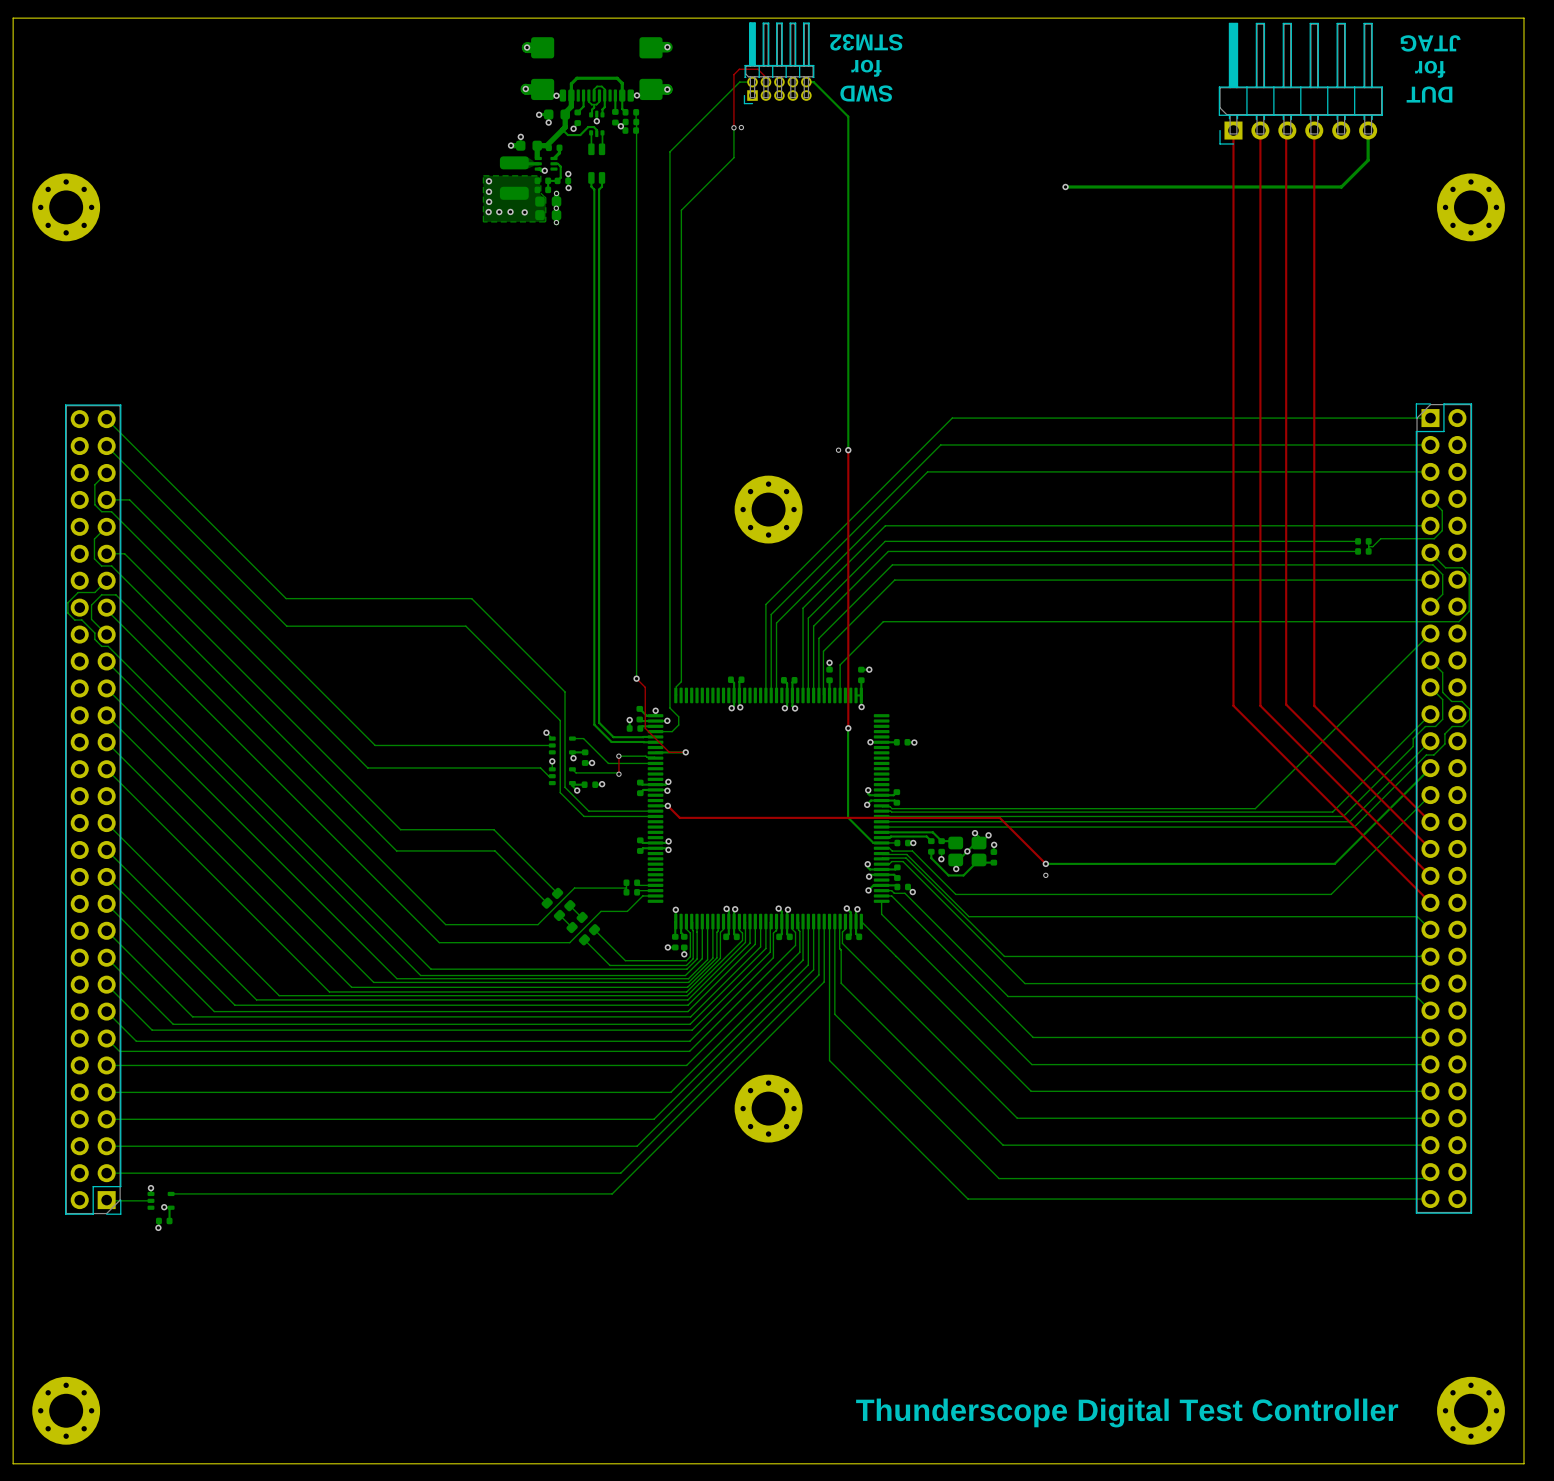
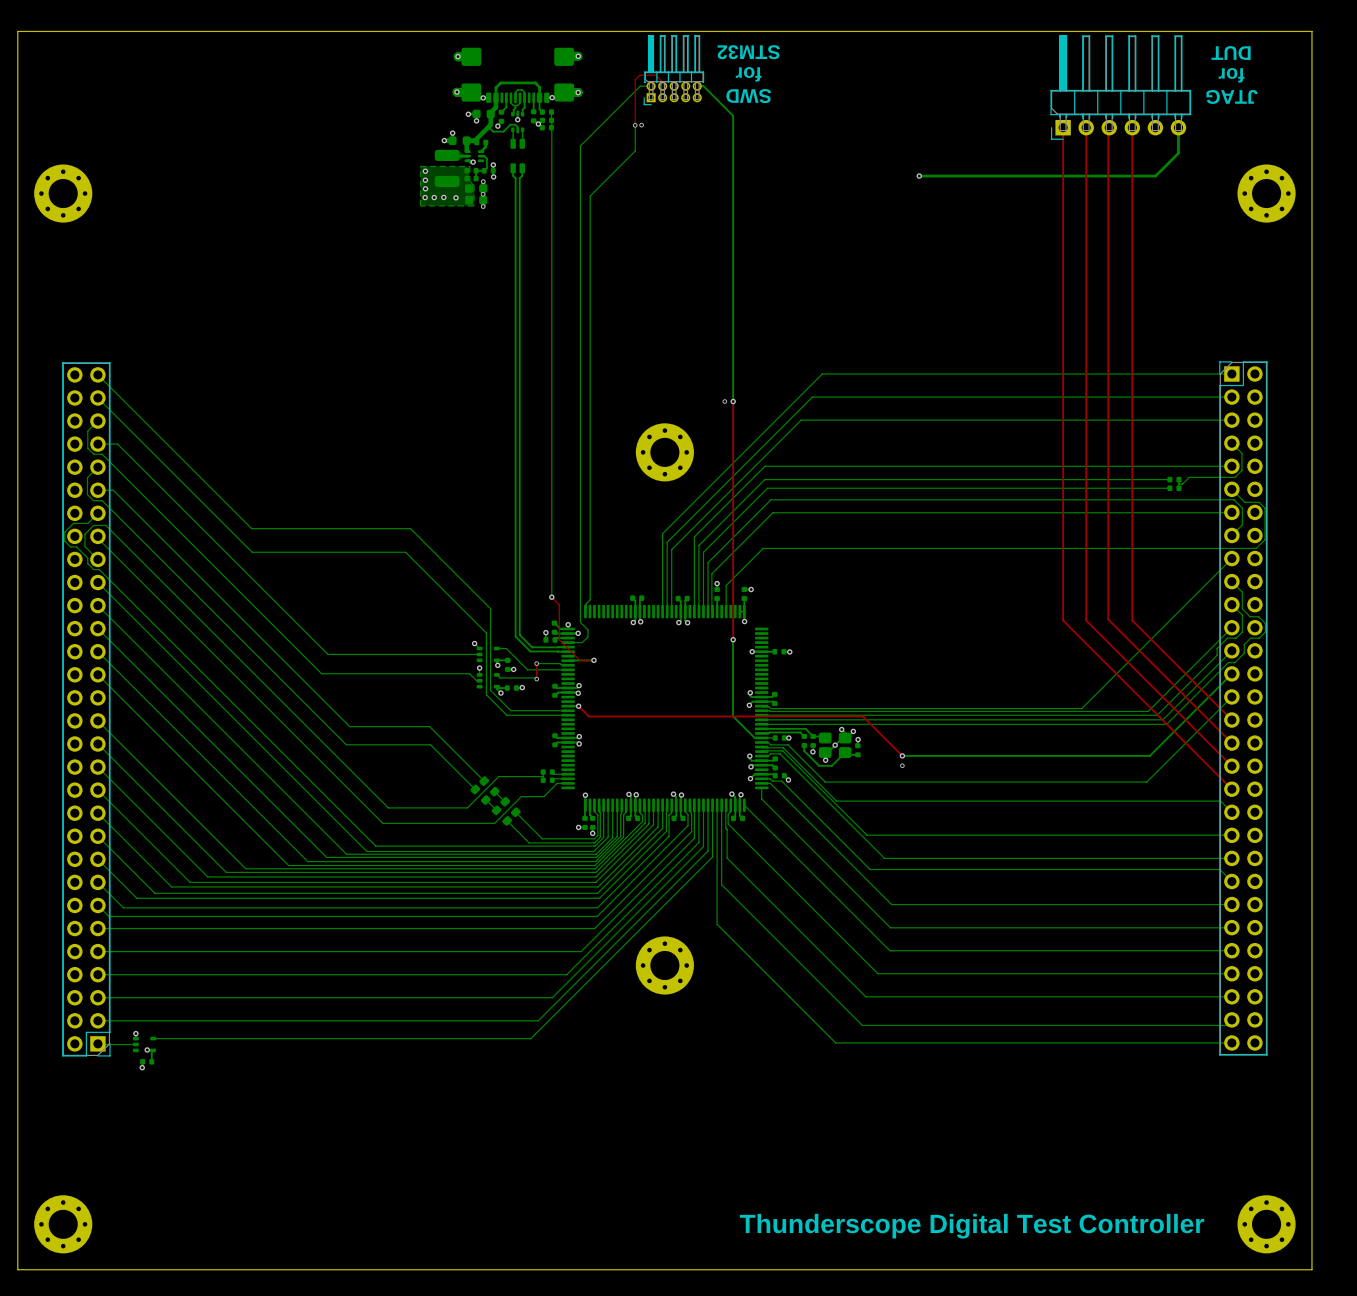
text: JTAG (1430, 43) -> DUT (1231, 52)
text: DUT (1429, 94) -> JTAG (1232, 96)

